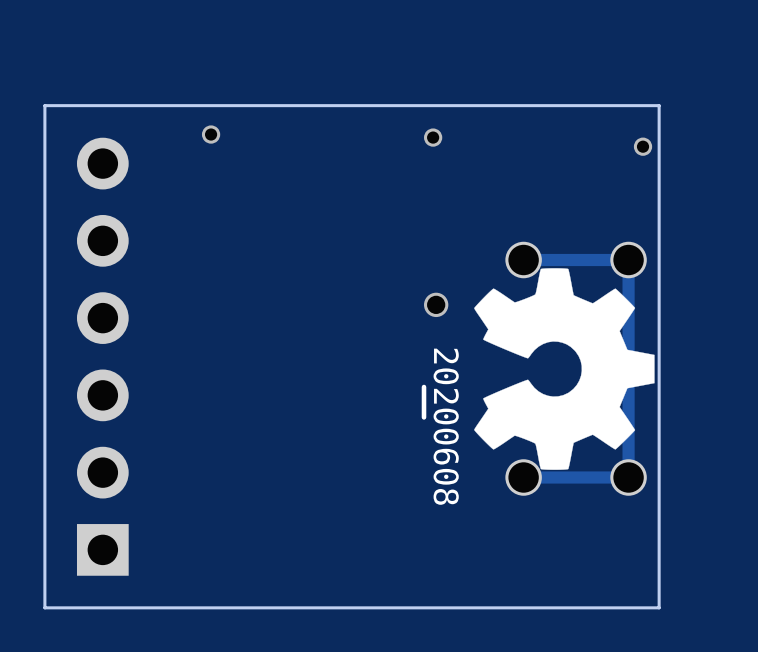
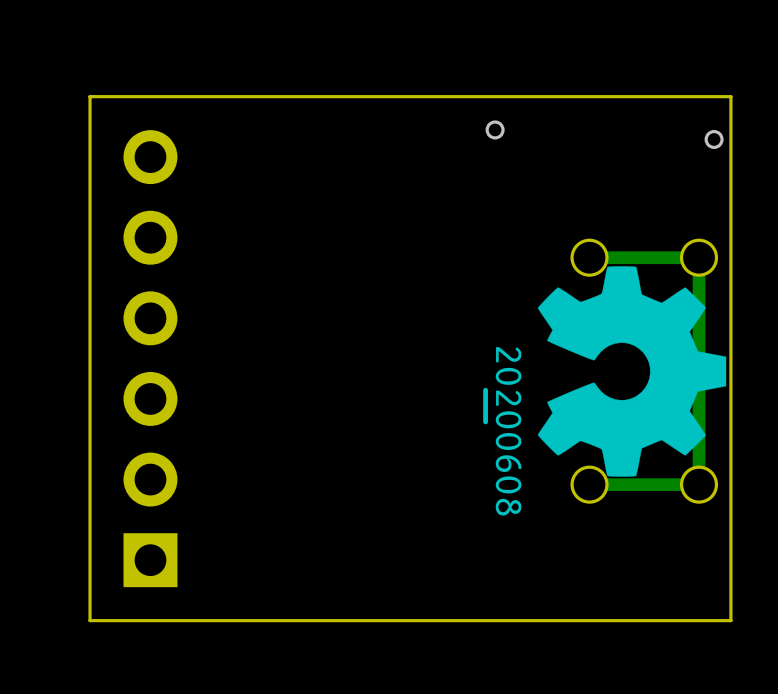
via: (211, 134) -> none
via: (436, 304) -> none

